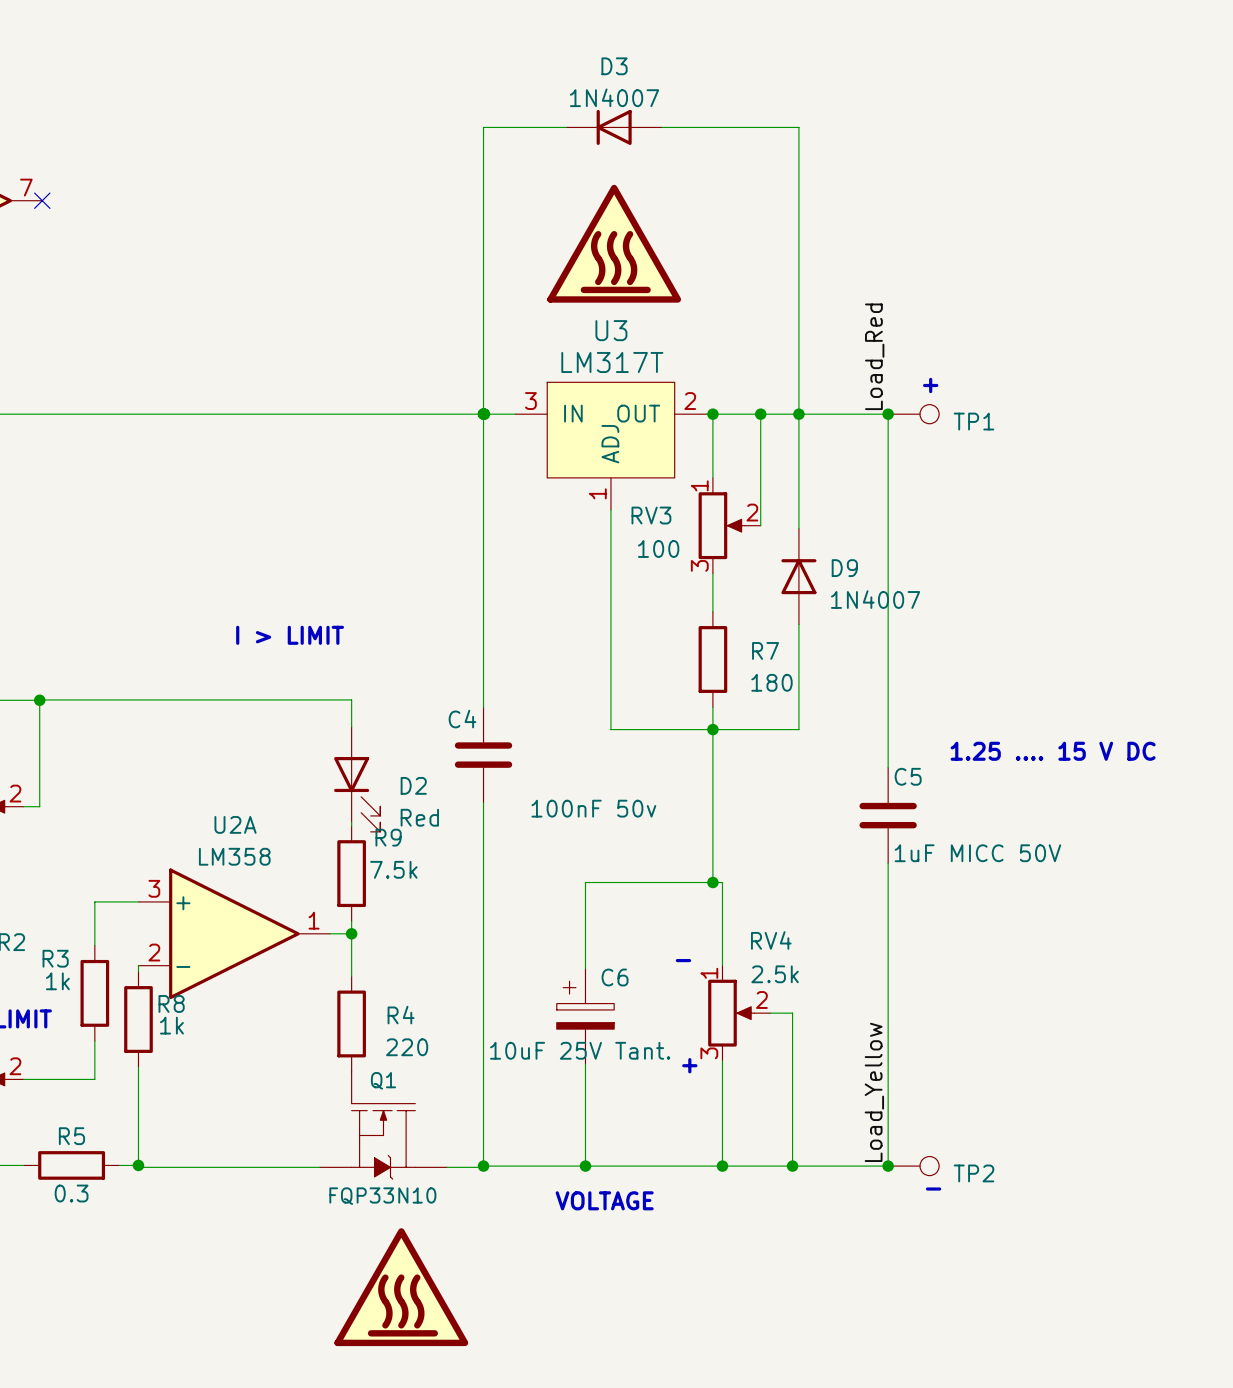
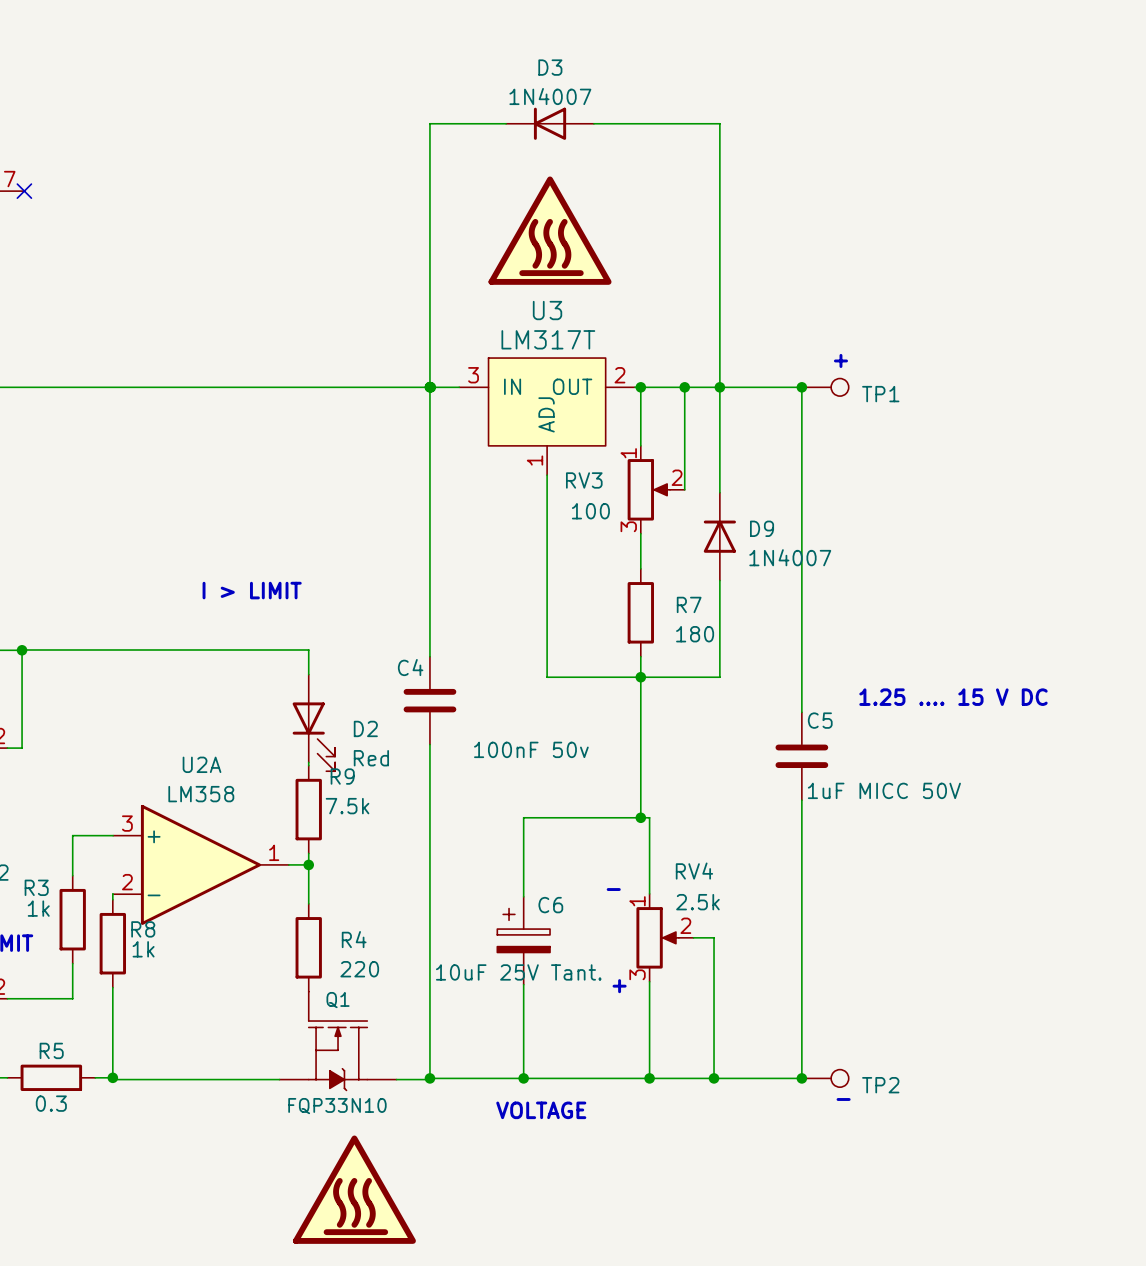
label: Load_Red (874, 356) -> none
label: Load_Yellow (874, 1092) -> none

